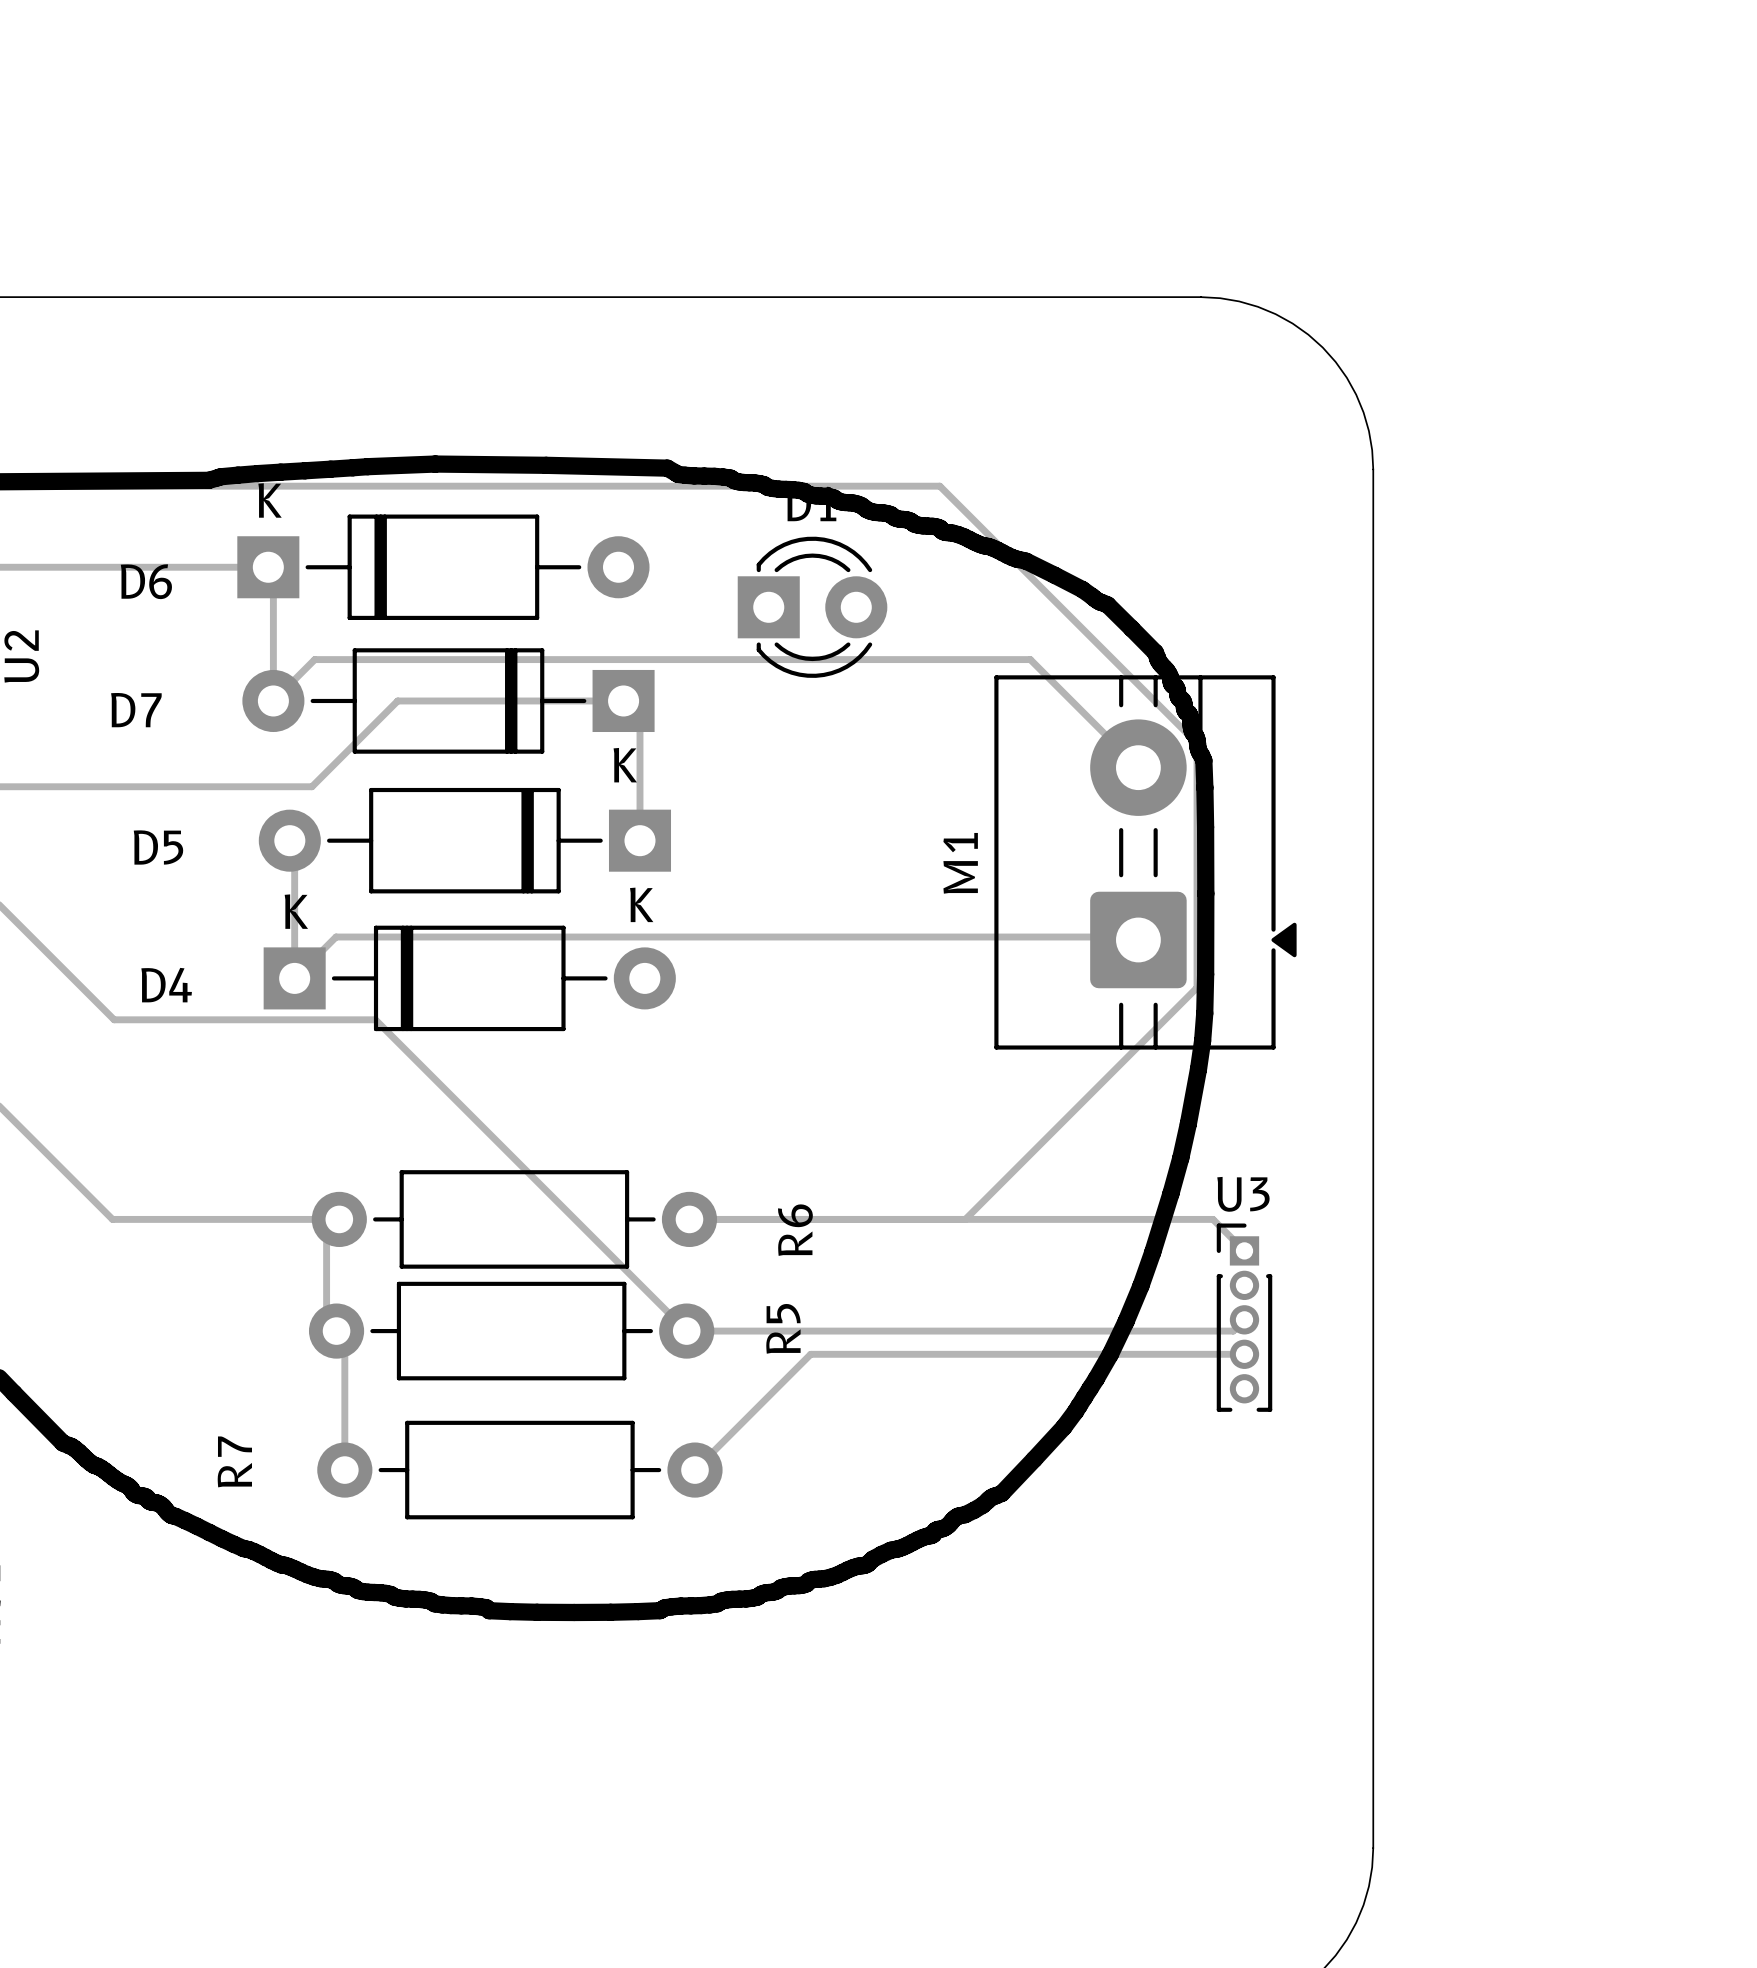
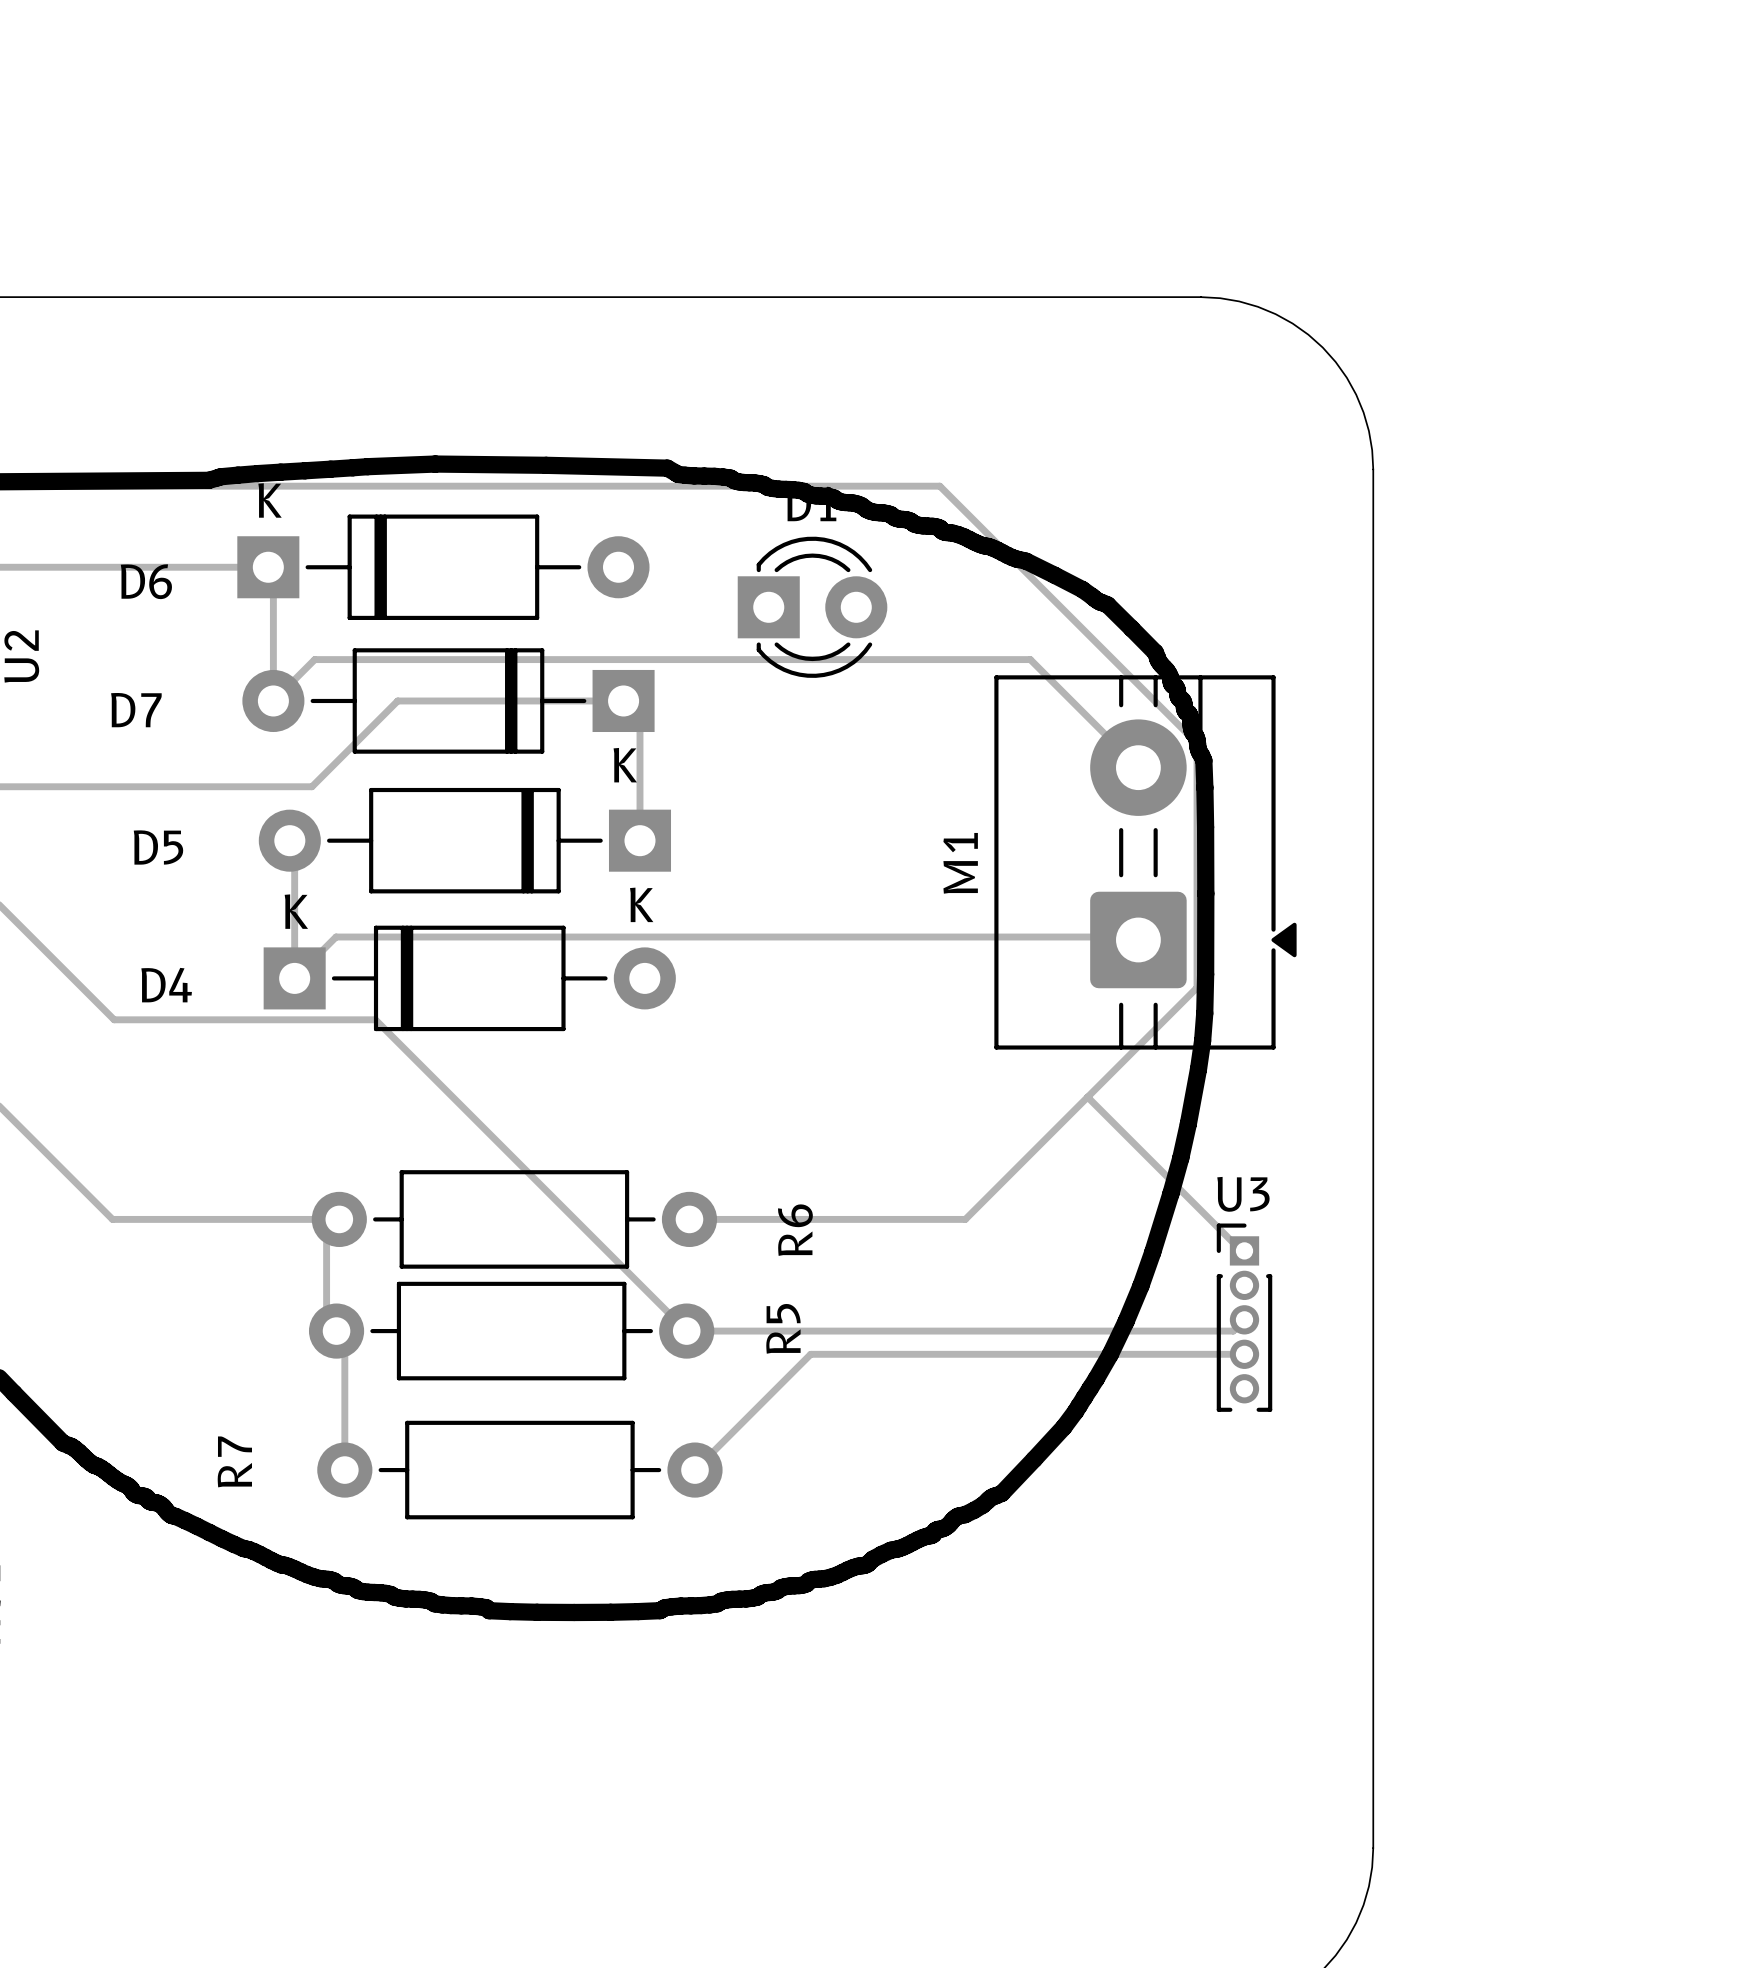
track: (965, 1219) (1213, 1219) (1244, 1250) -> (1087, 1097) (1241, 1250) (1244, 1250)

